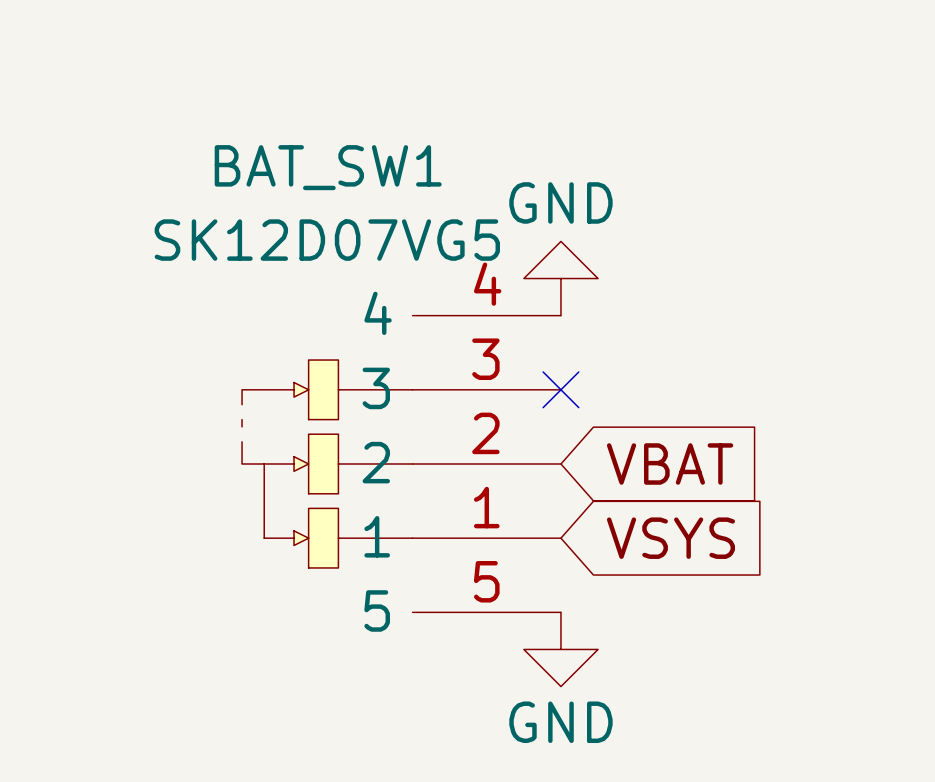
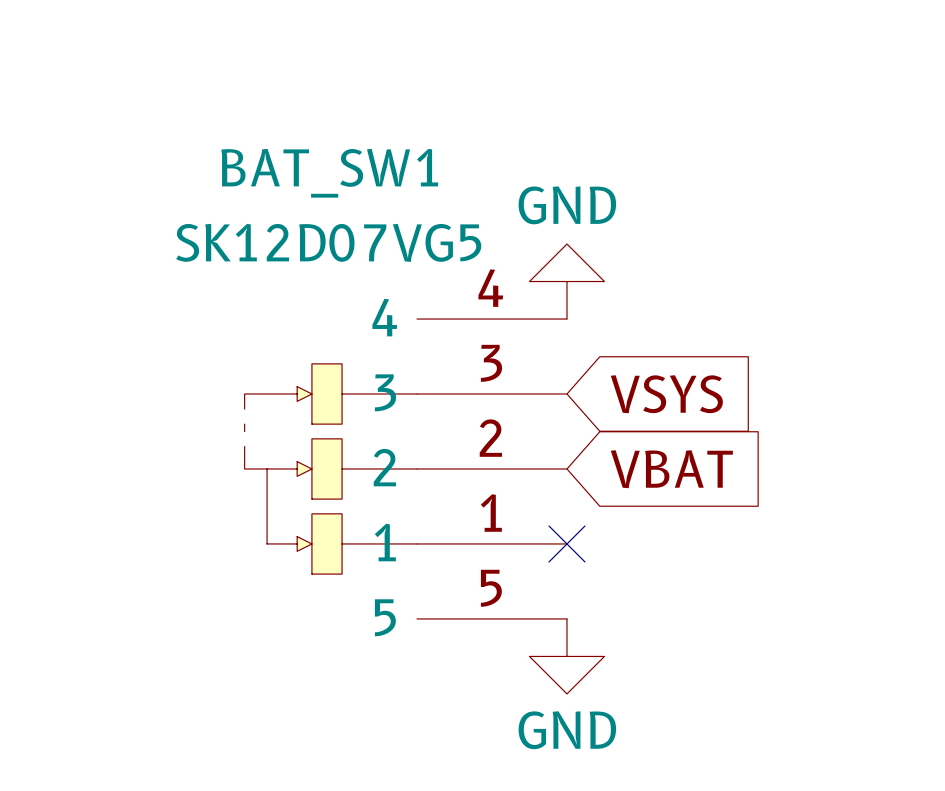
no-connect mark position: (560, 389) -> (566, 543)
global label position: VSYS (670, 538) -> VSYS (666, 394)

